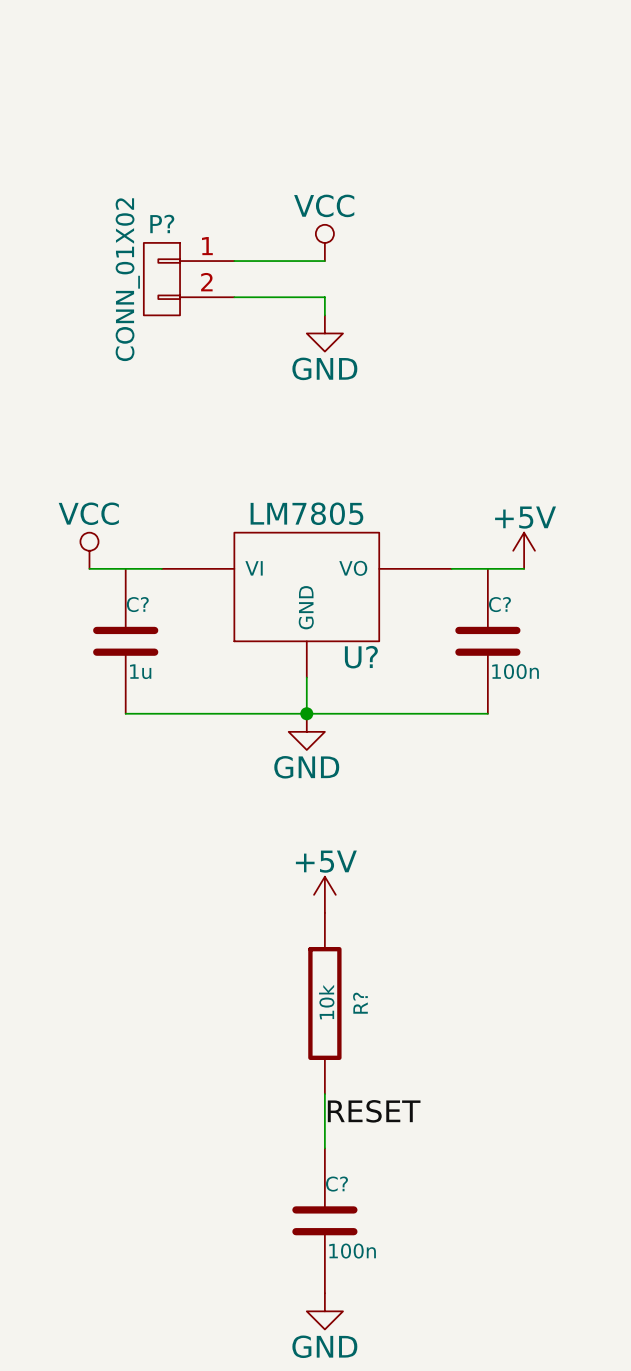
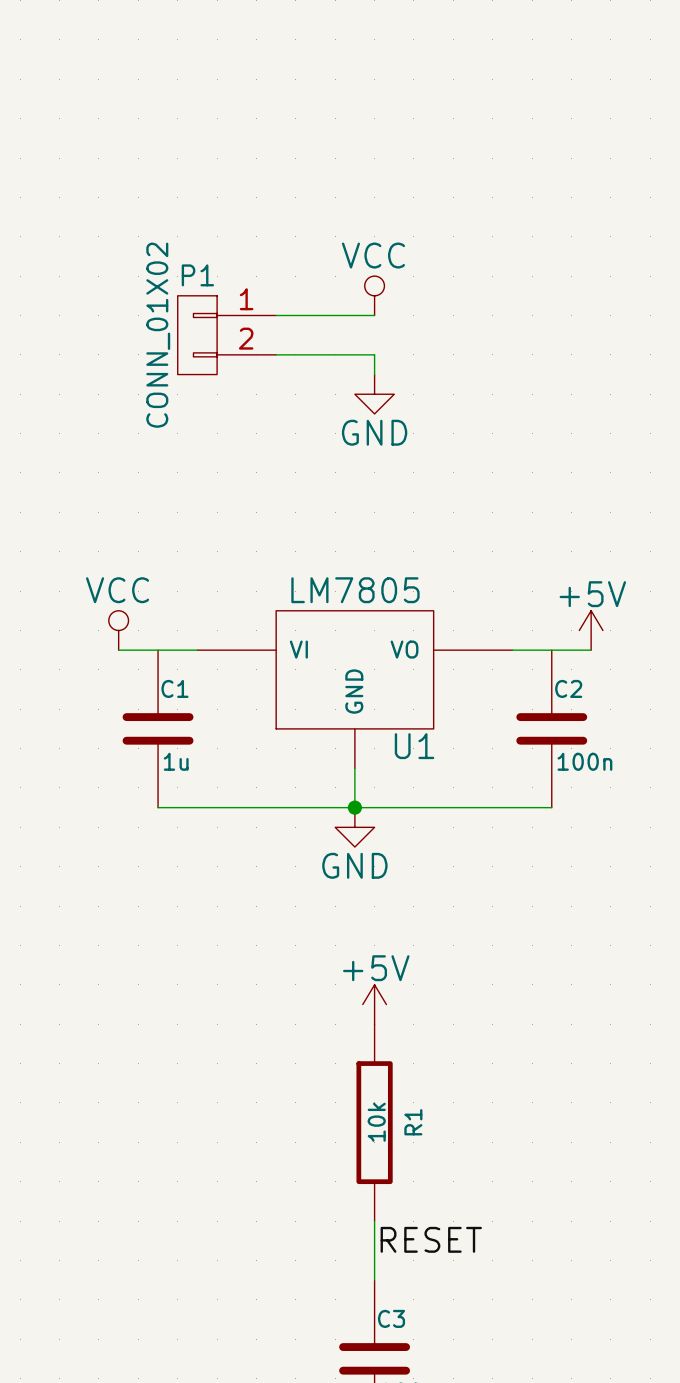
P? name: P? (162, 223) -> P1 (197, 275)
C? name: C? (137, 604) -> C1 (174, 688)
C? name: C? (499, 604) -> C2 (568, 688)
U? name: U? (361, 657) -> U1 (414, 746)
R? name: R? (360, 1003) -> R1 (413, 1122)
C? name: C? (336, 1184) -> C3 (391, 1318)

